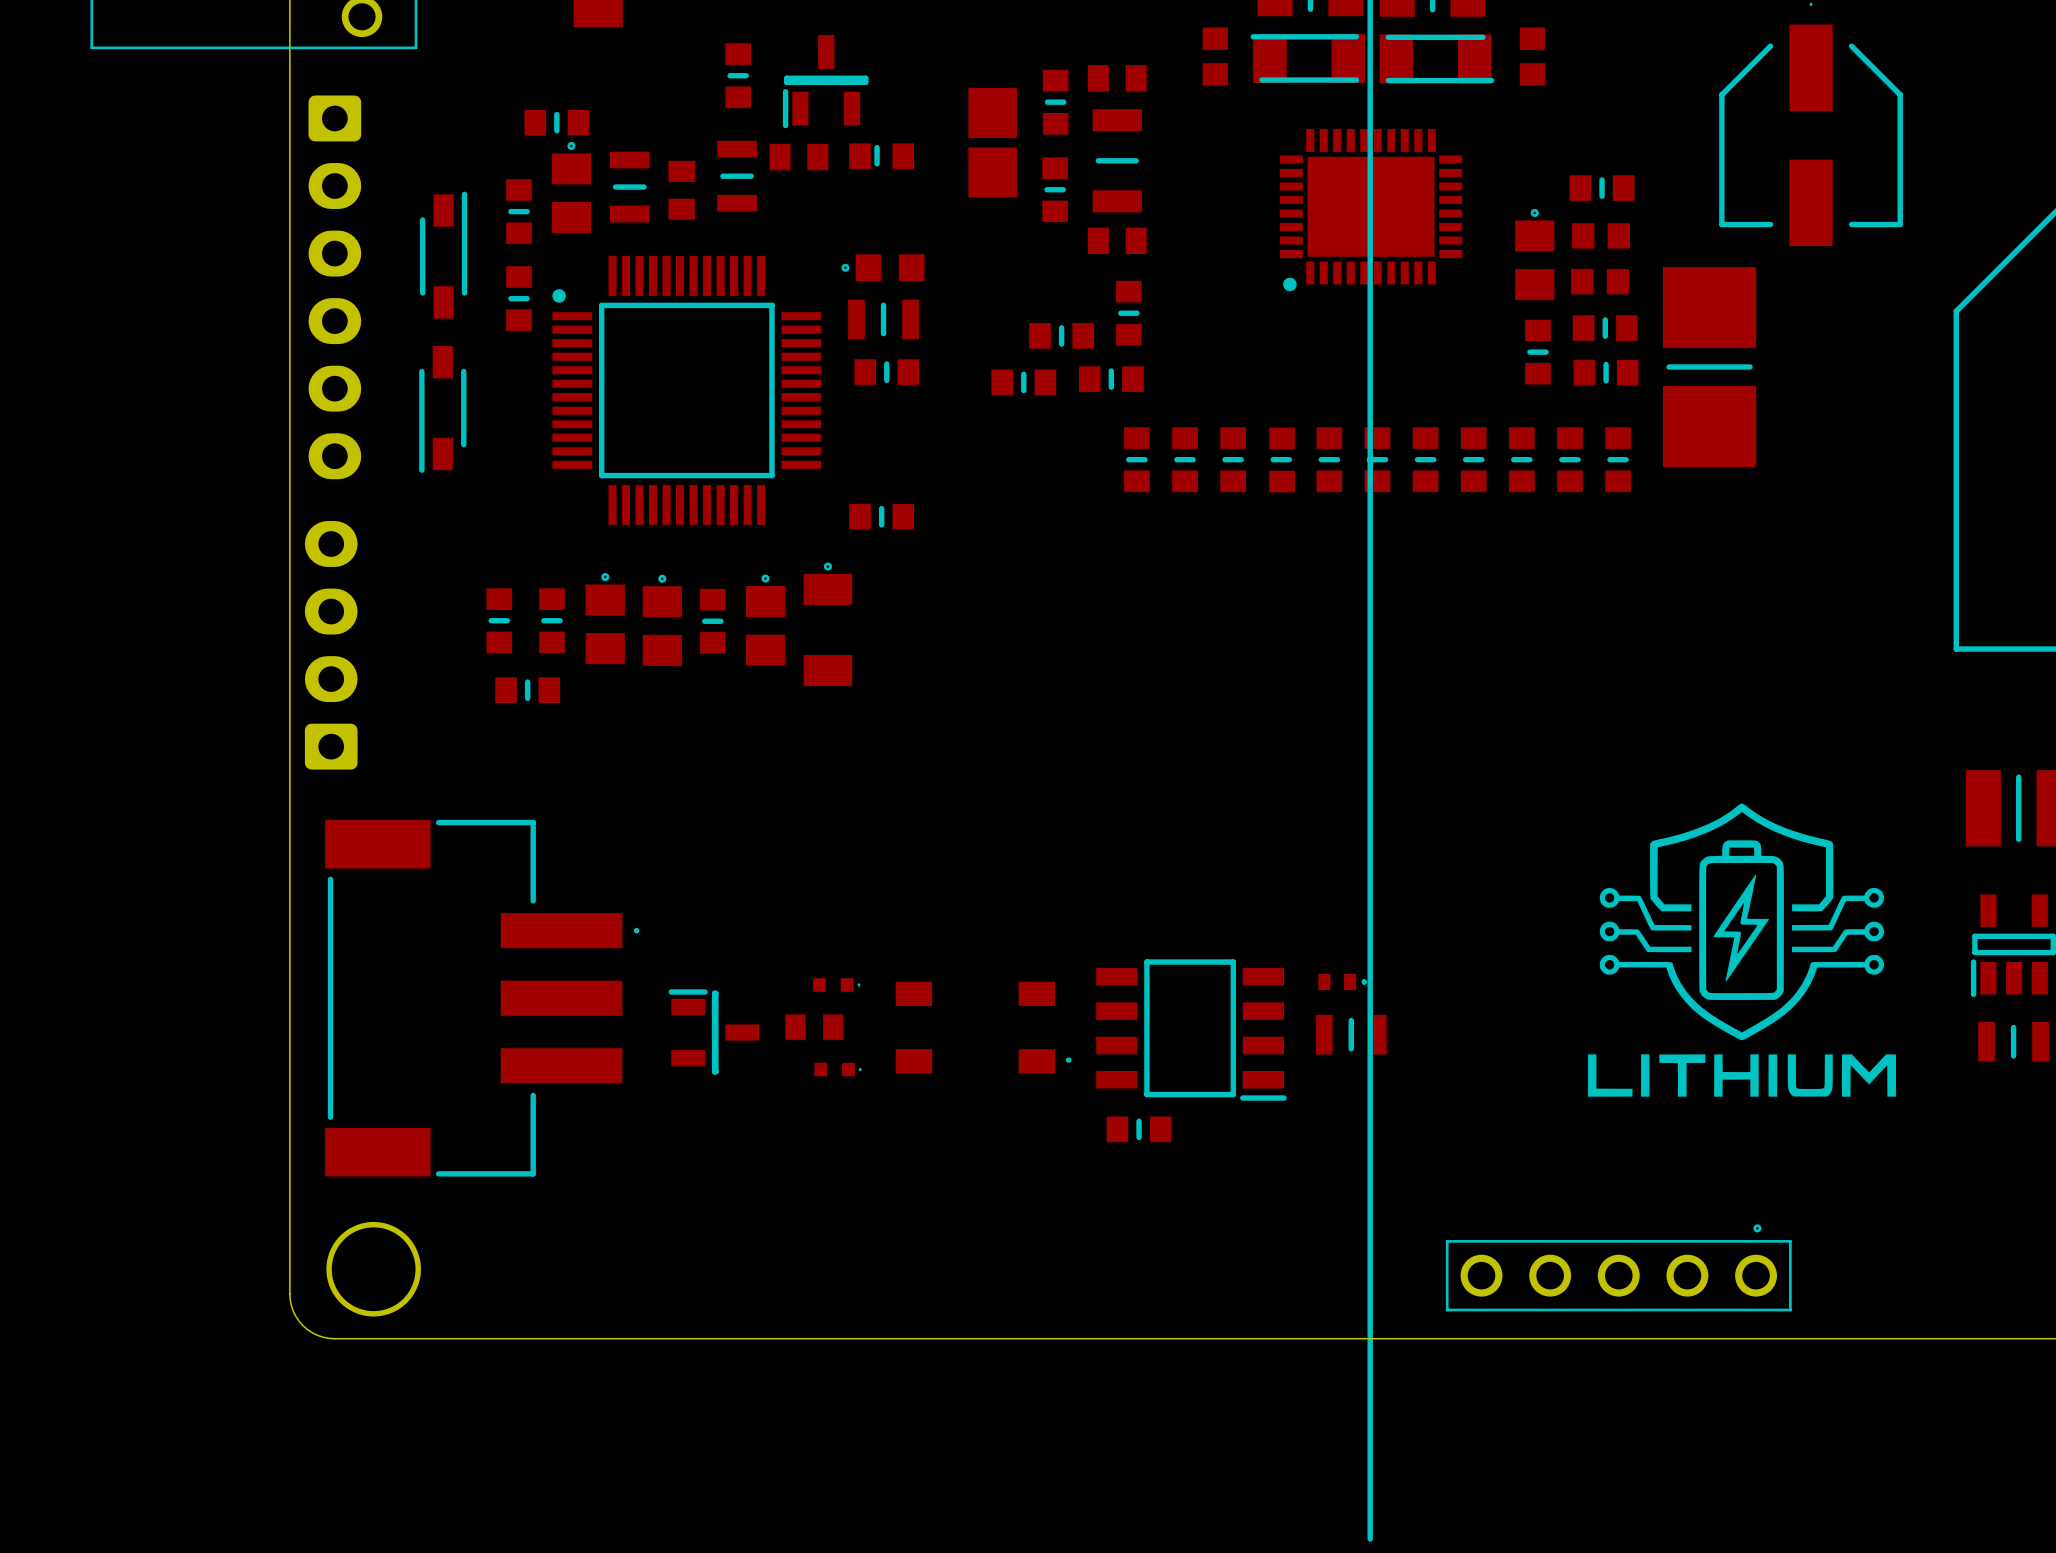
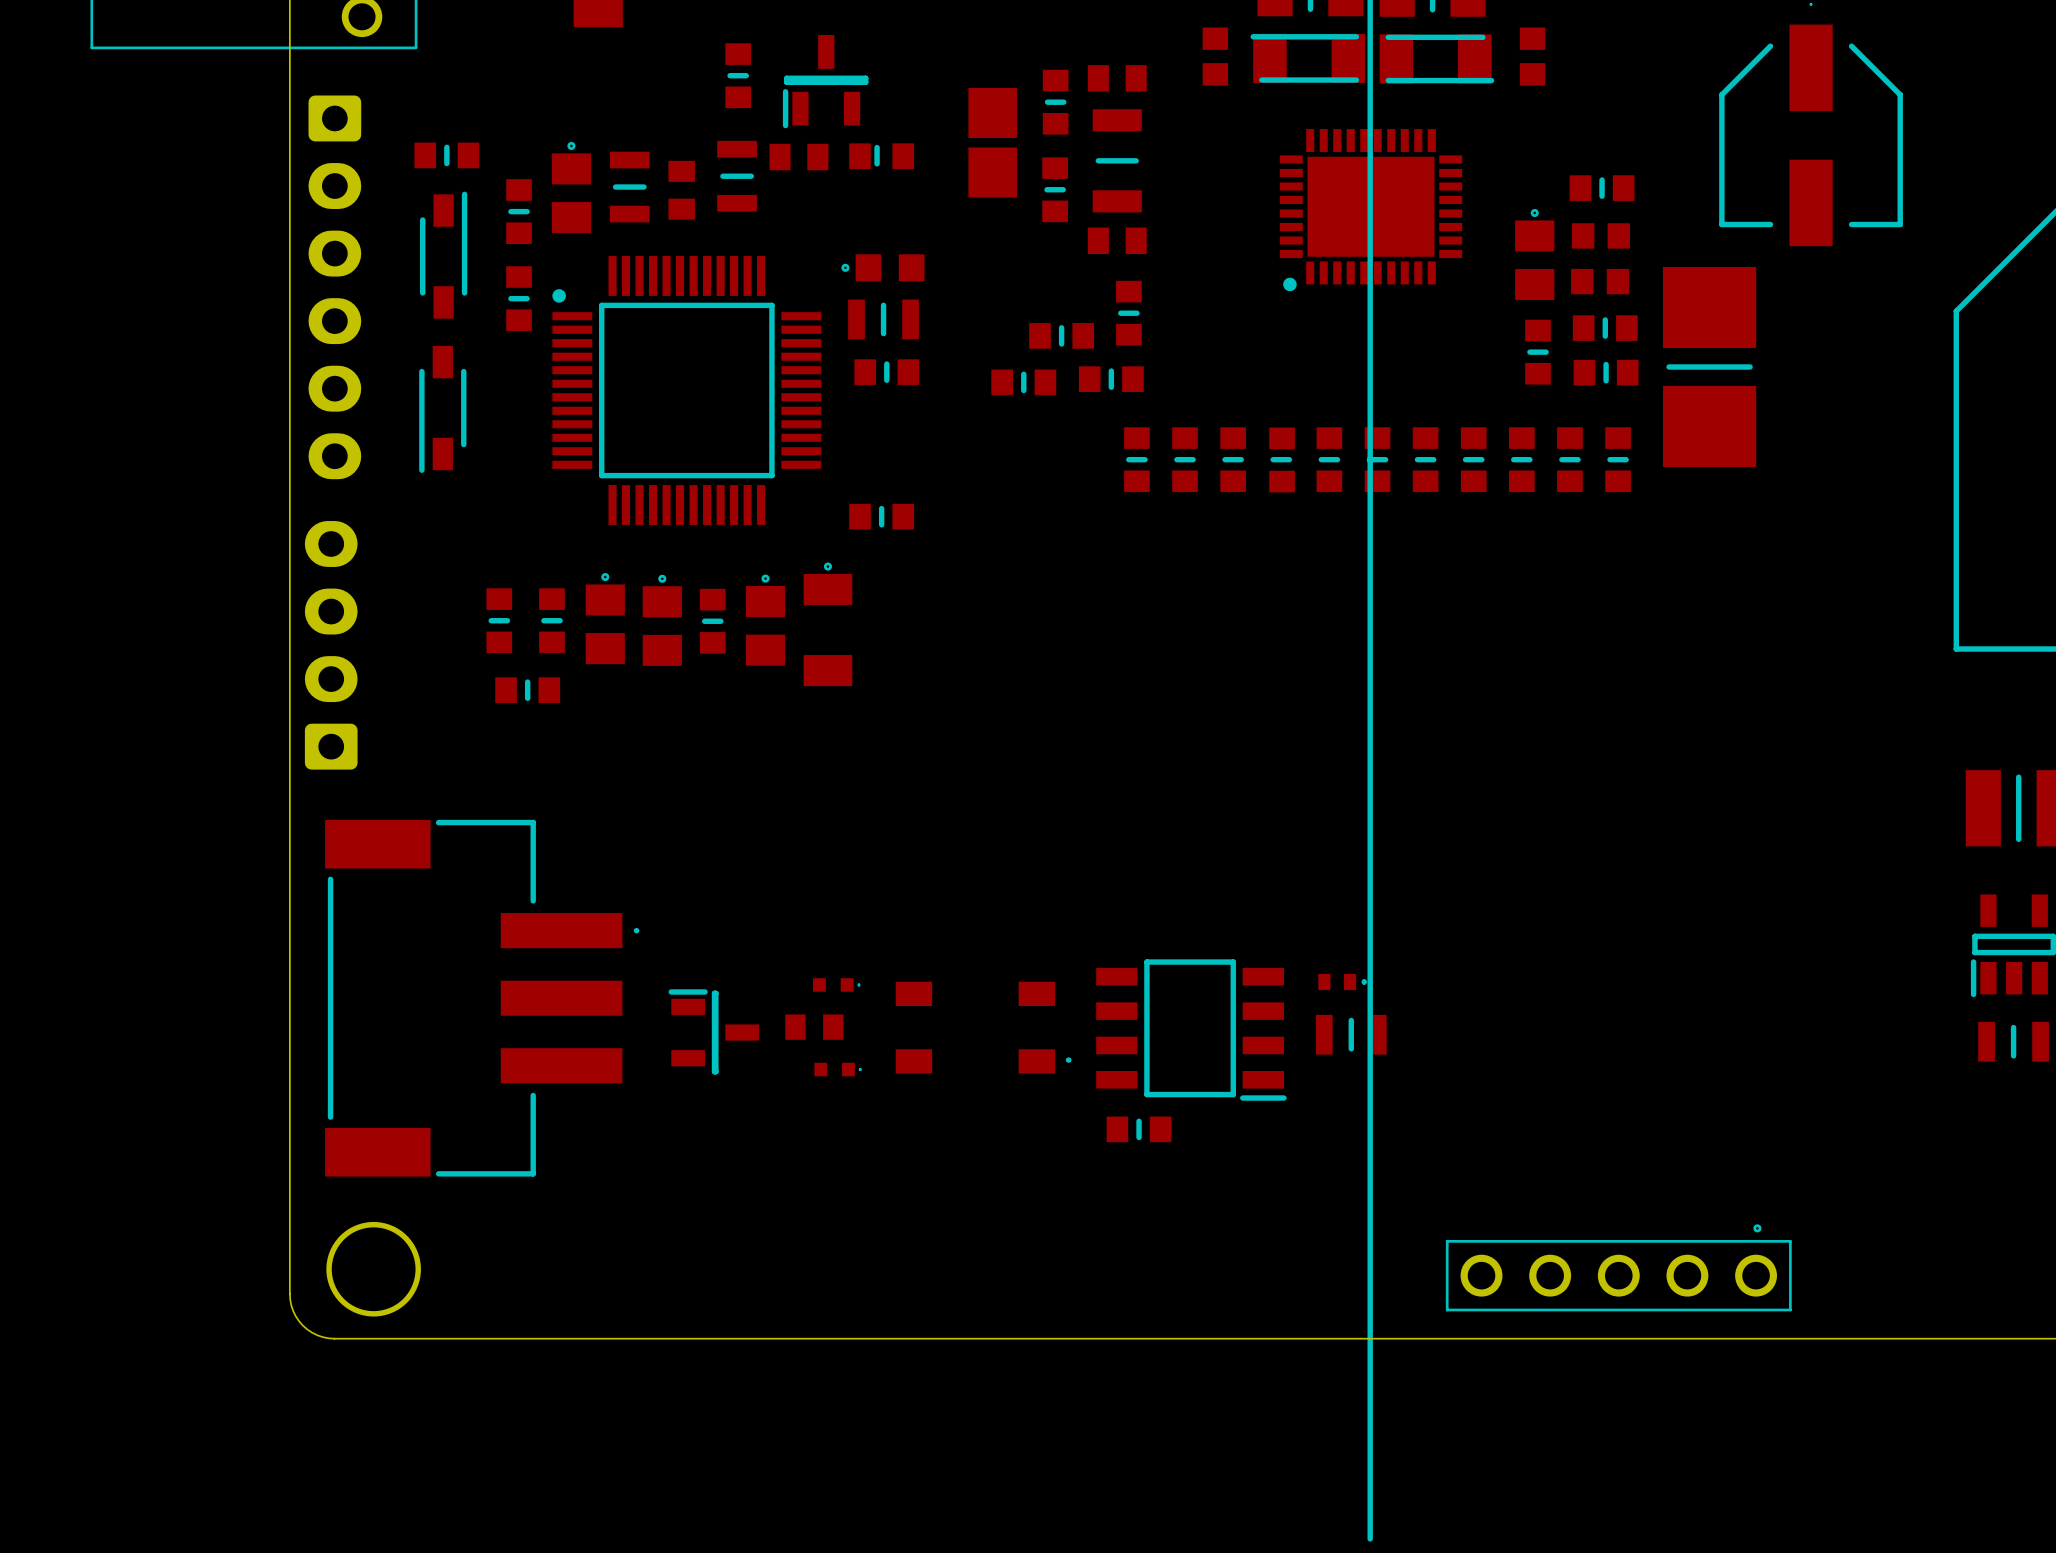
part position: (556, 122) -> (446, 155)
drawing: [1588, 803, 1896, 1097] -> none

